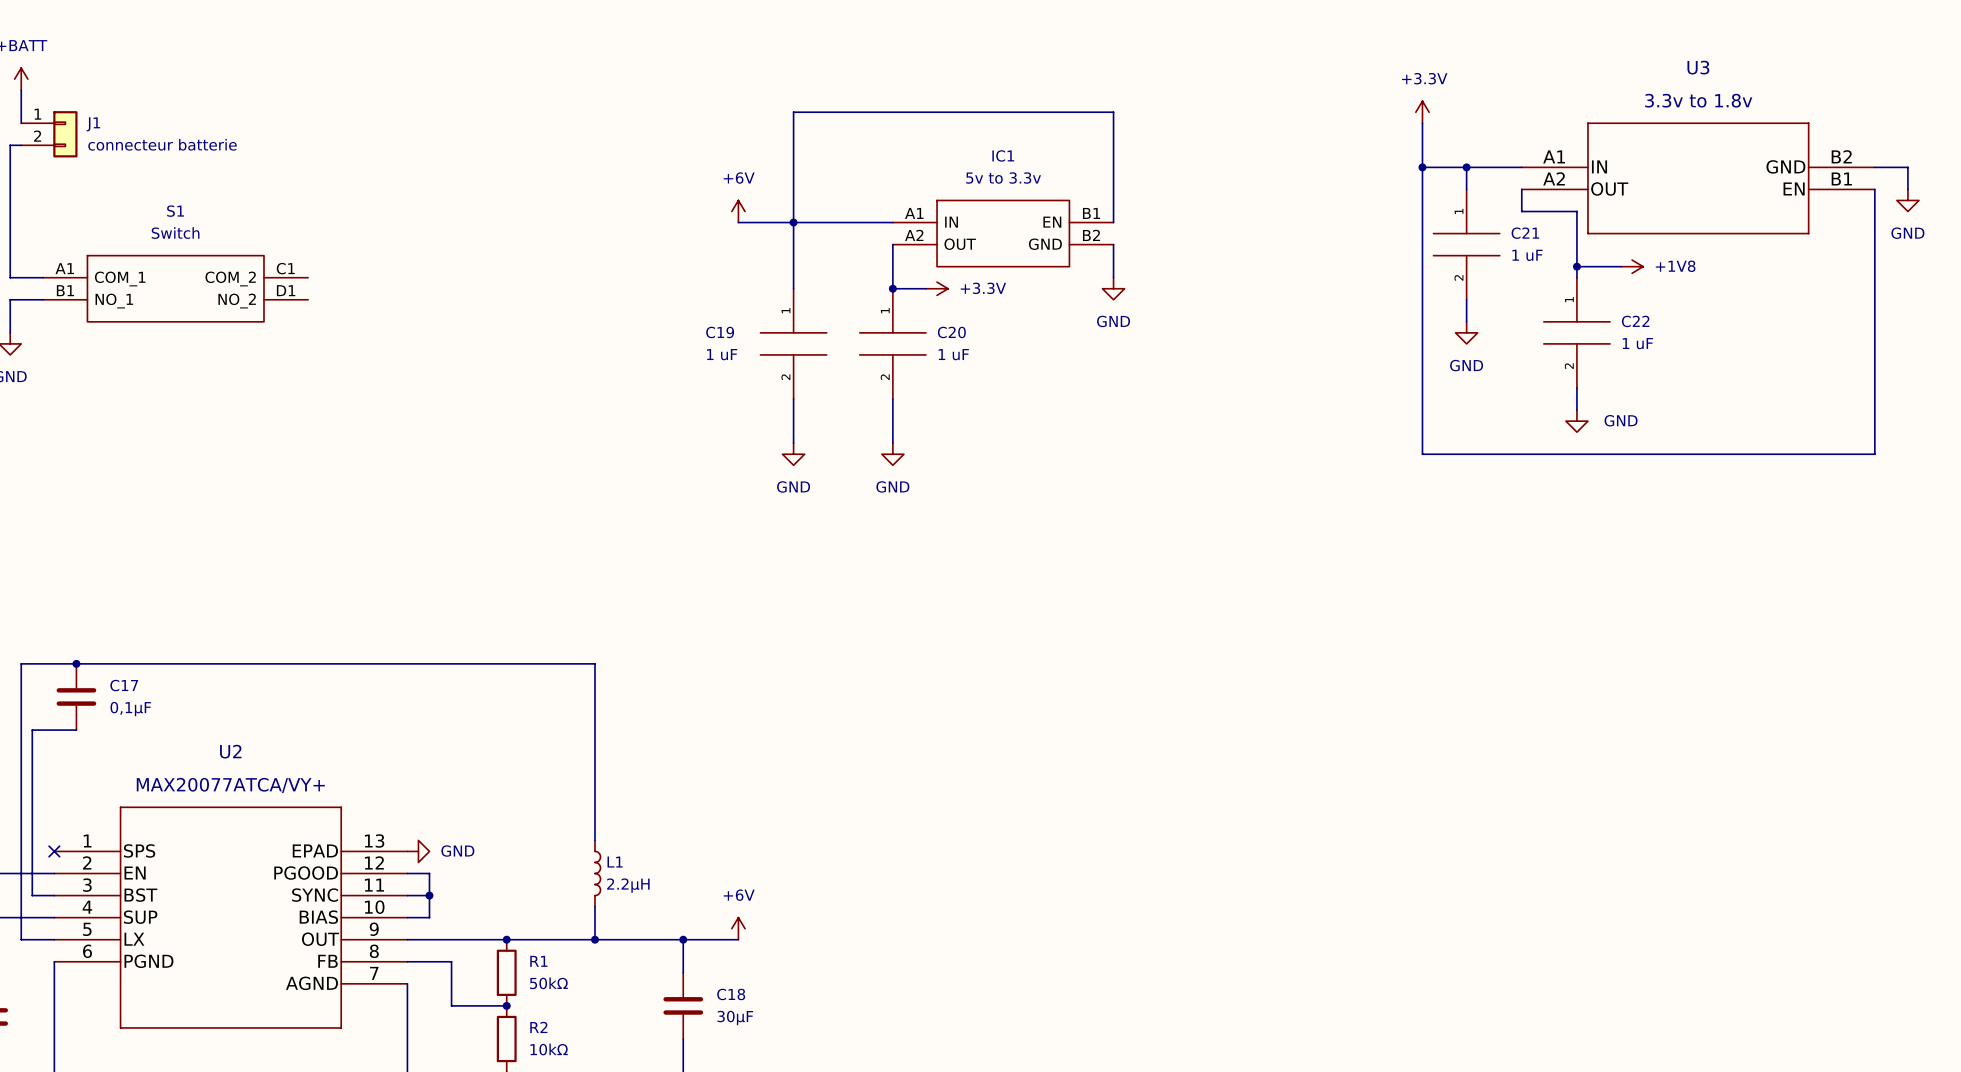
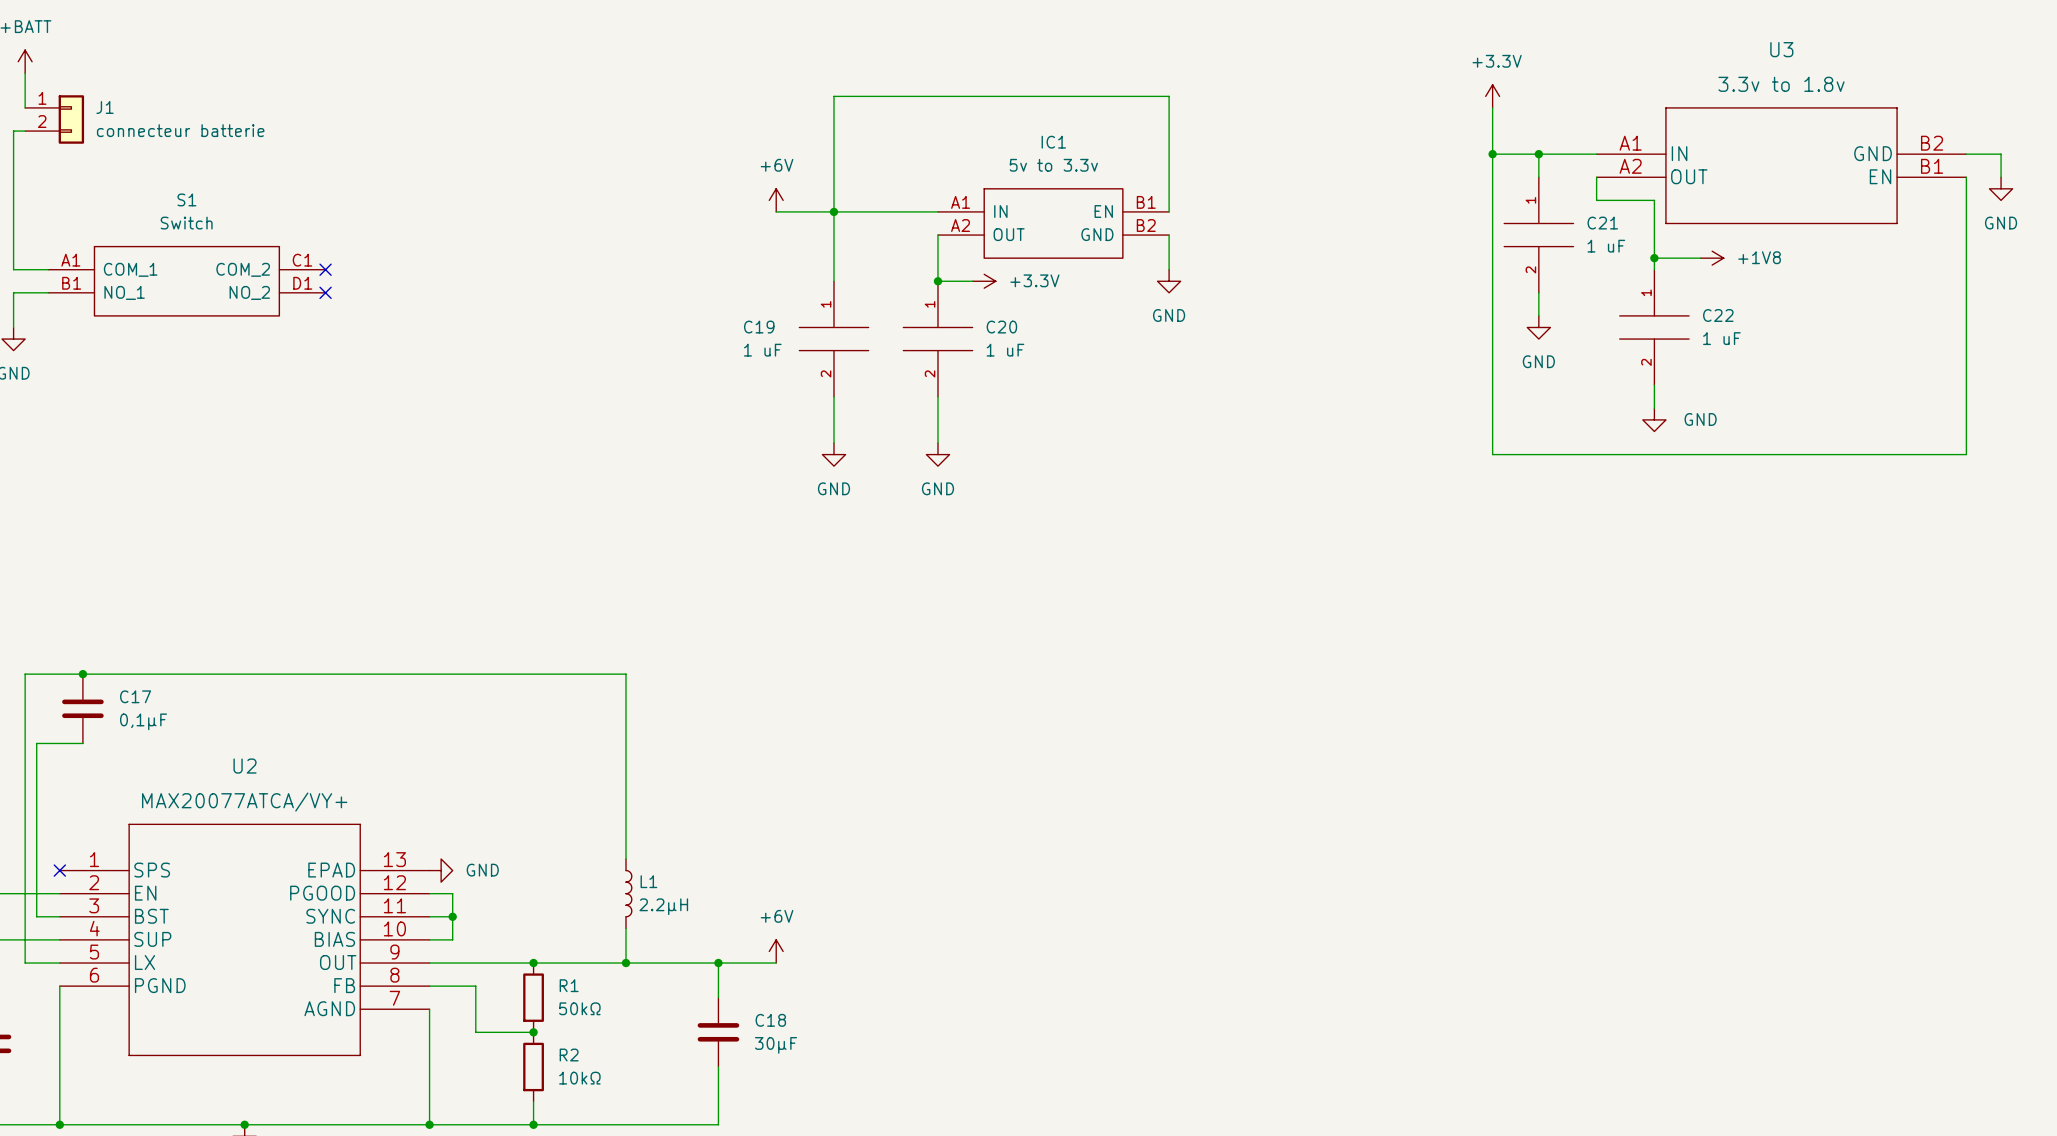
no-connect mark: none -> (325, 269)
no-connect mark: none -> (325, 292)

